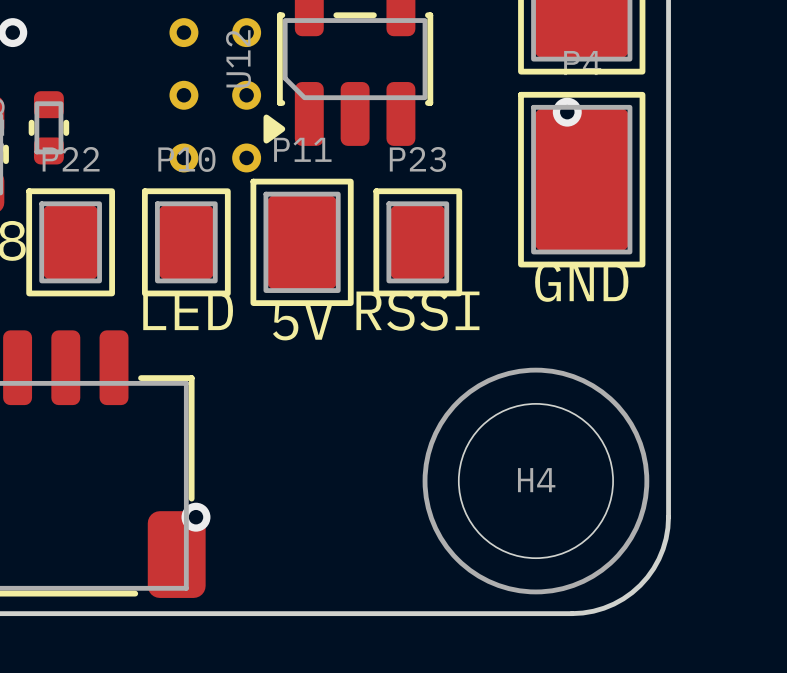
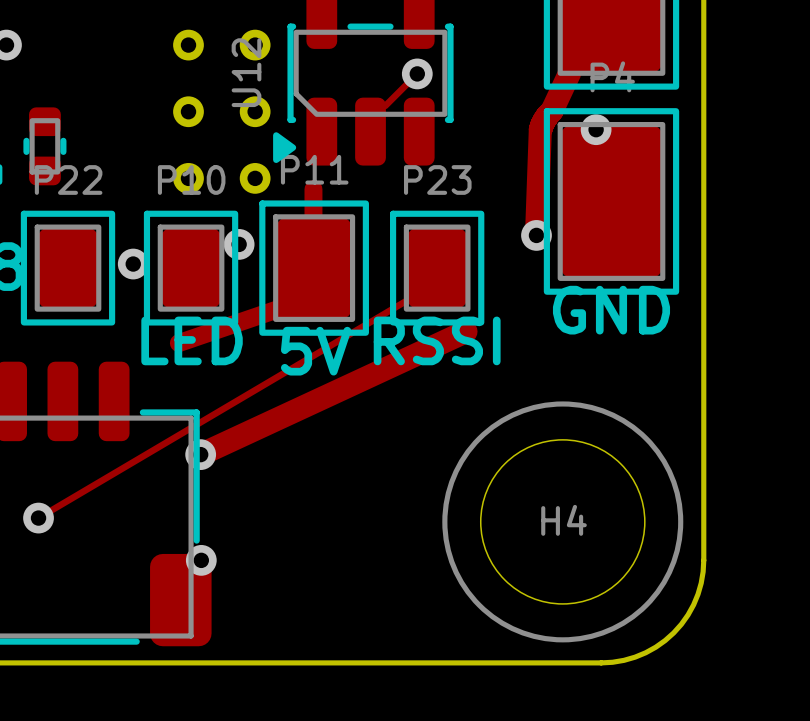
track: none -> (569, 72) (551, 111) (544, 120) (540, 129) (536, 235)
track: none -> (417, 73) (385, 105)
via: none -> (417, 73)
track: none -> (313, 189) (313, 217)
via: none -> (536, 235)
via: none -> (239, 244)
via: none -> (133, 264)
track: none -> (407, 300) (38, 518)
track: none -> (276, 309) (178, 343)
track: none -> (466, 331) (200, 454)
via: none -> (200, 454)
via: none -> (38, 518)

